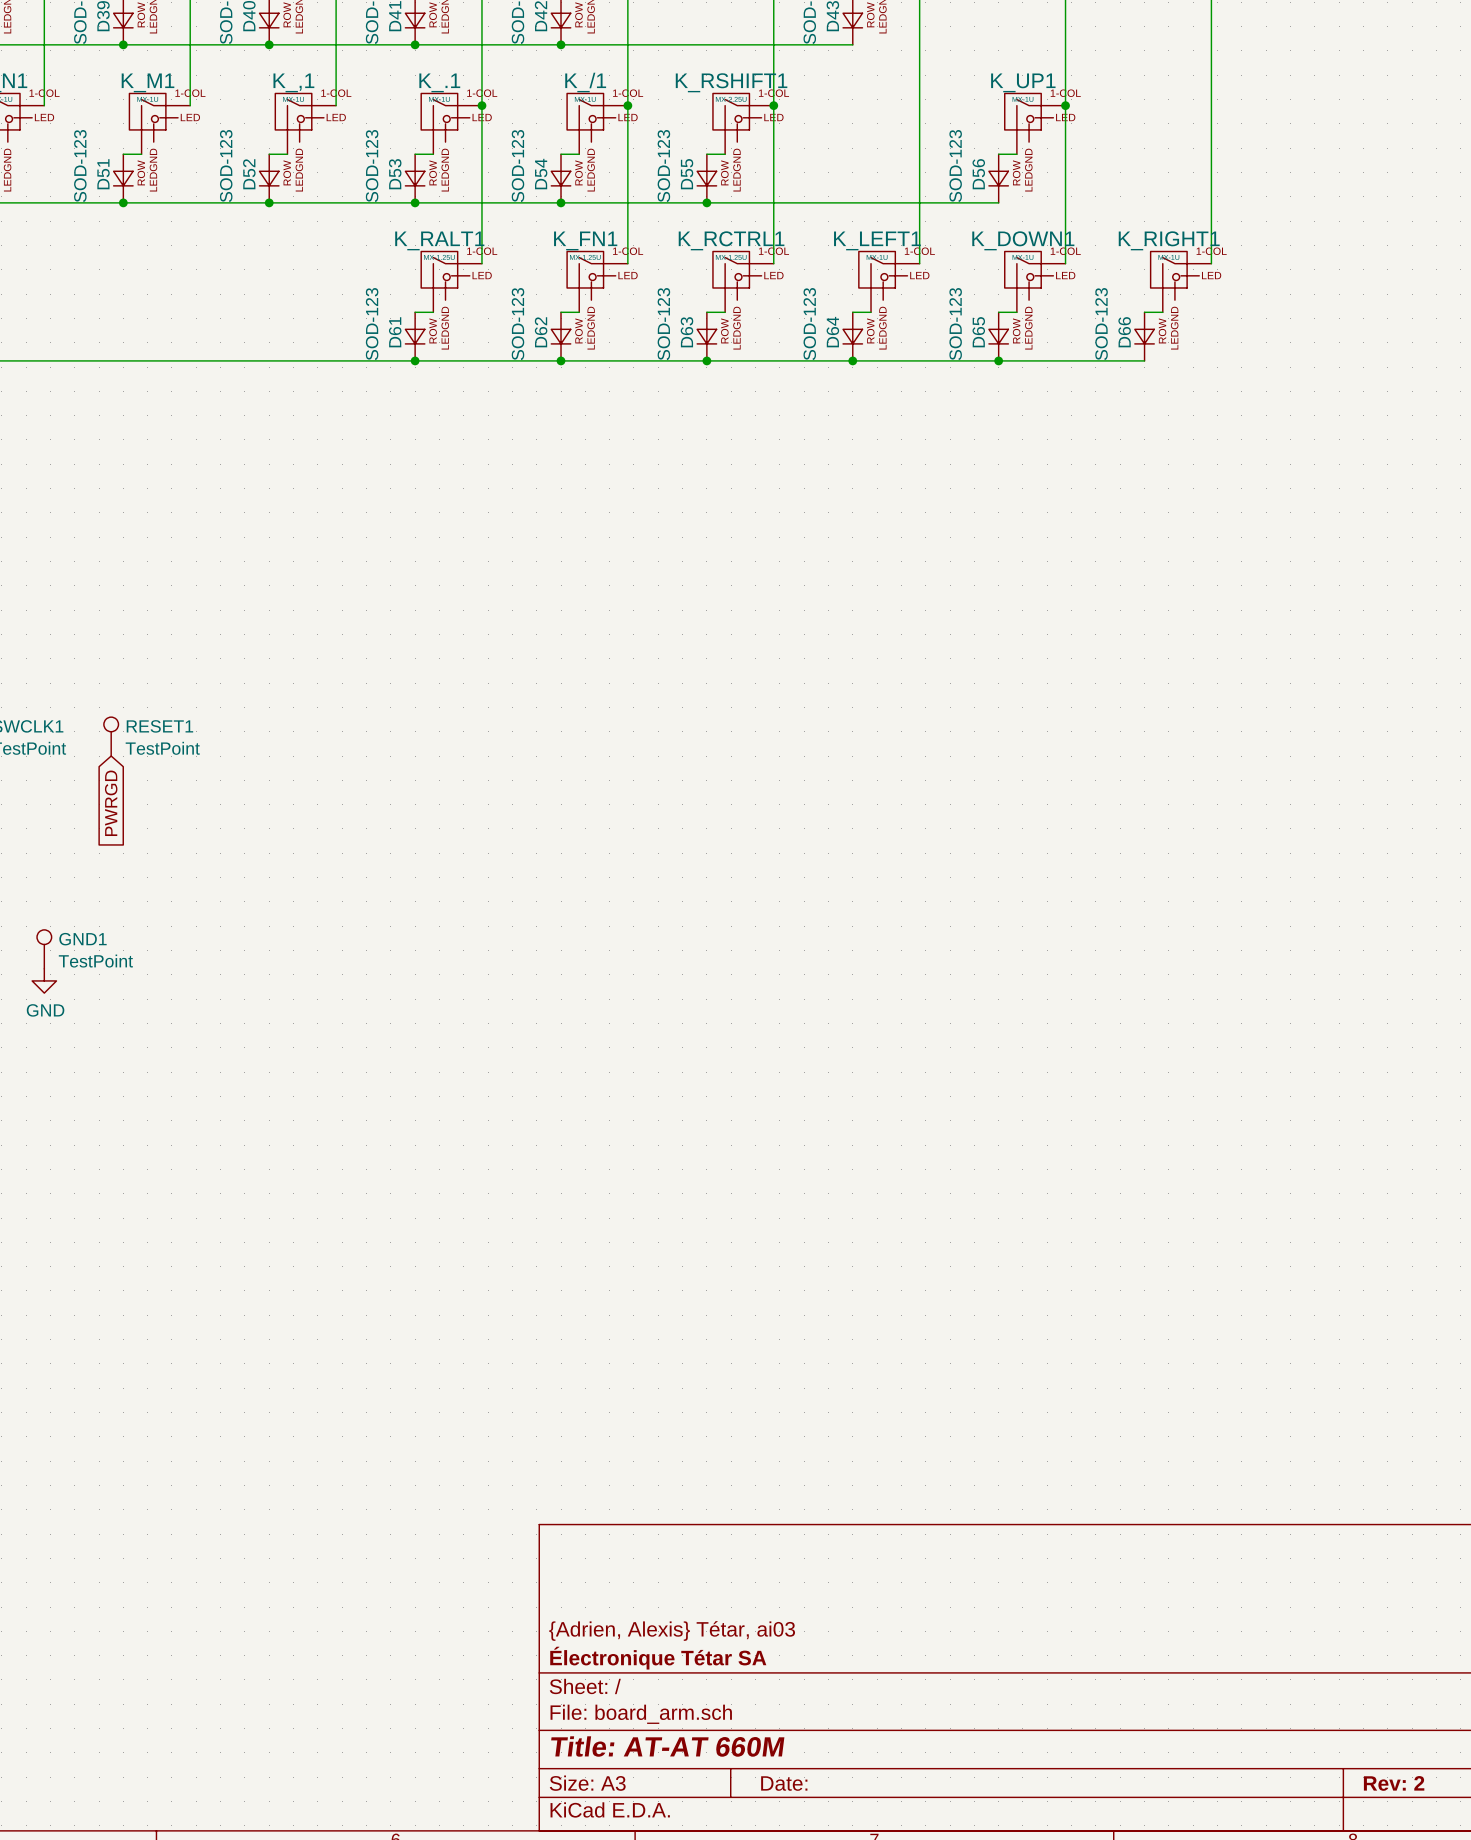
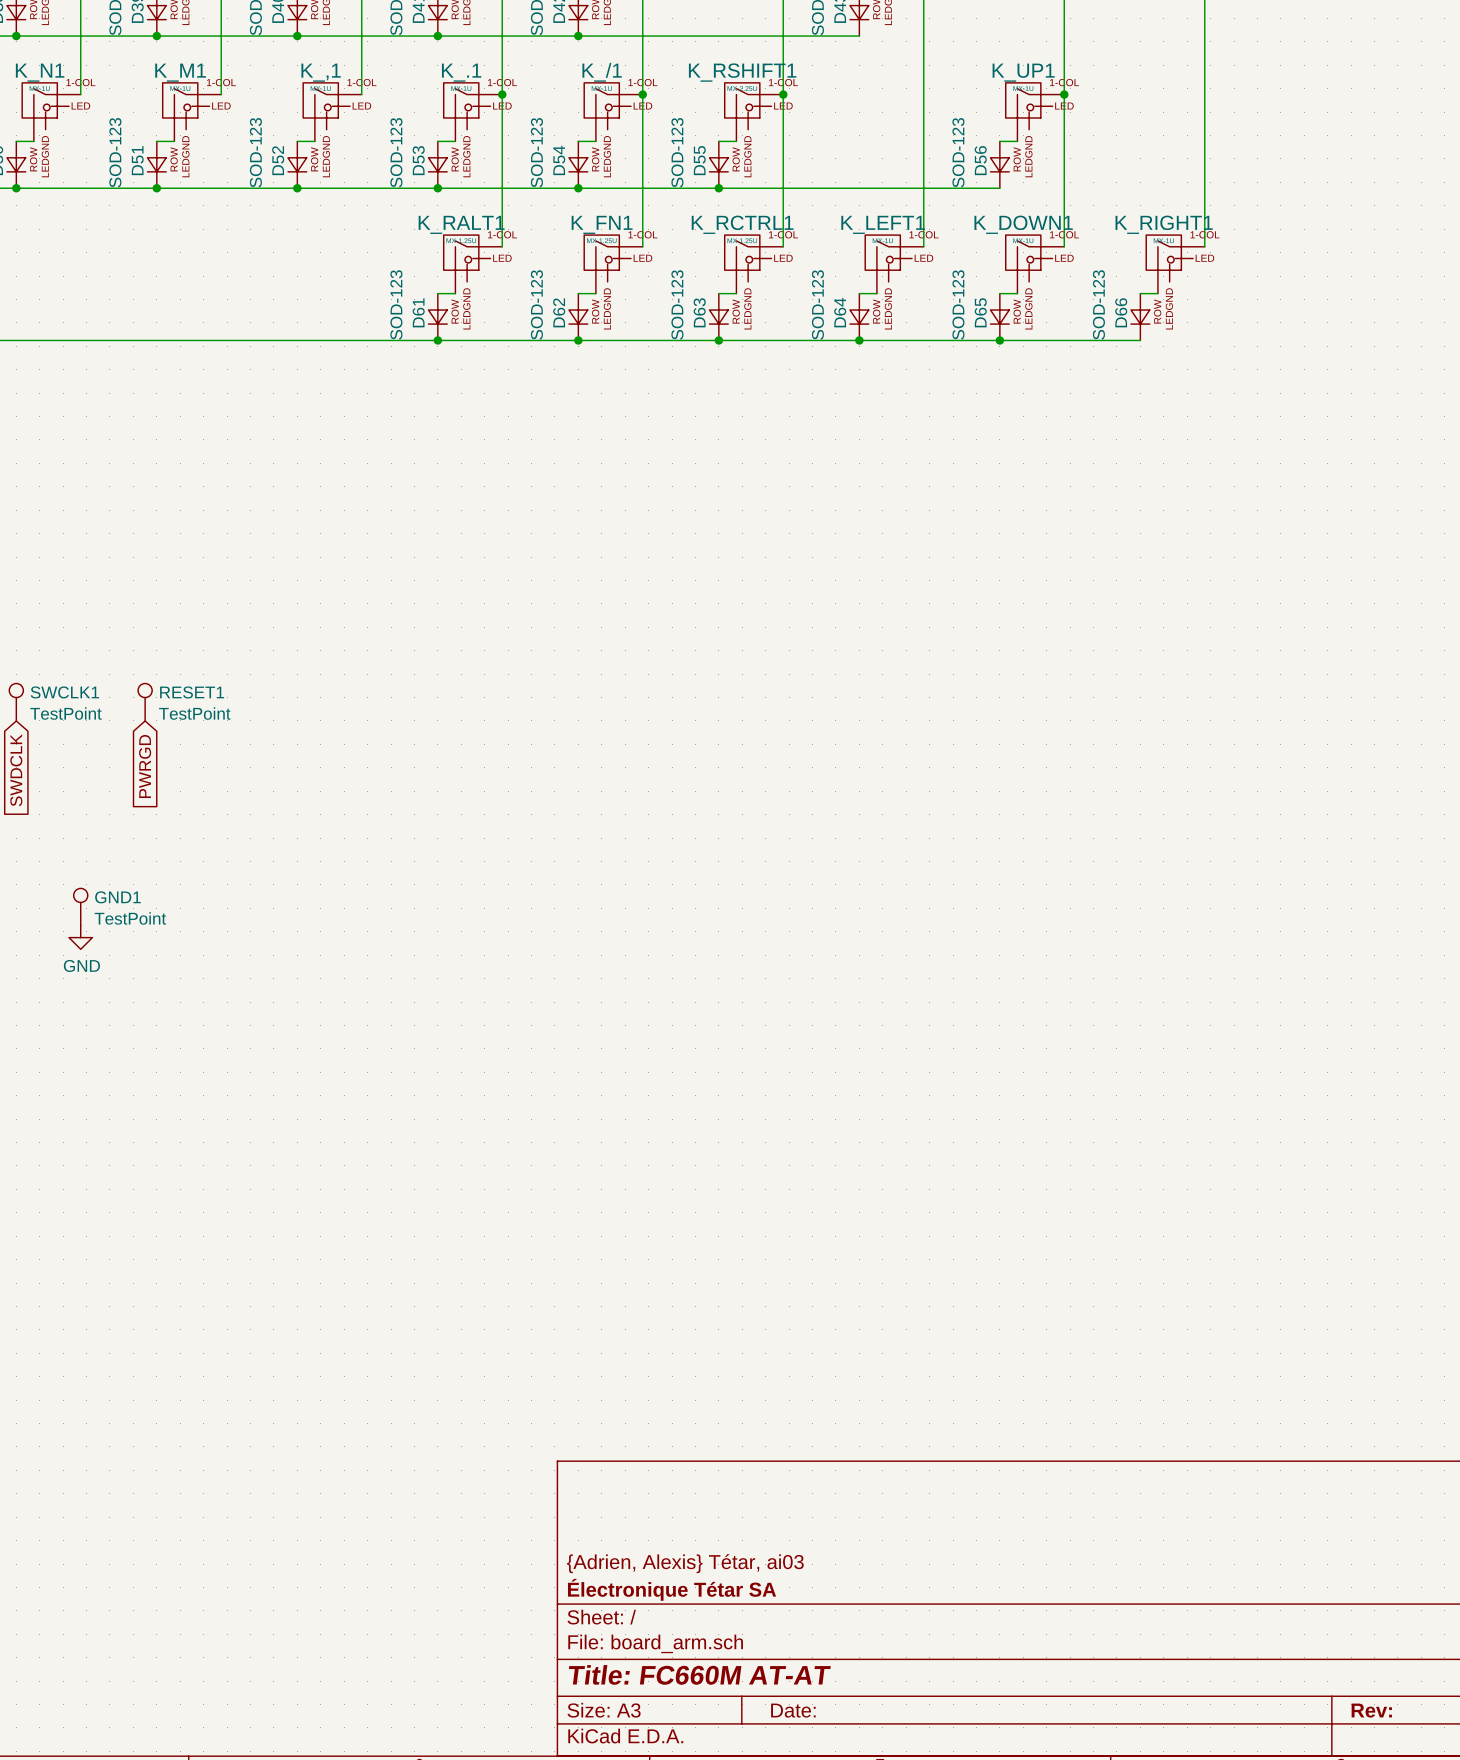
title block: Title: AT-AT 660M (667, 1746) -> Title: FC660M AT-AT (699, 1674)
title block: Rev: 2 (1394, 1783) -> Rev: (1371, 1710)

